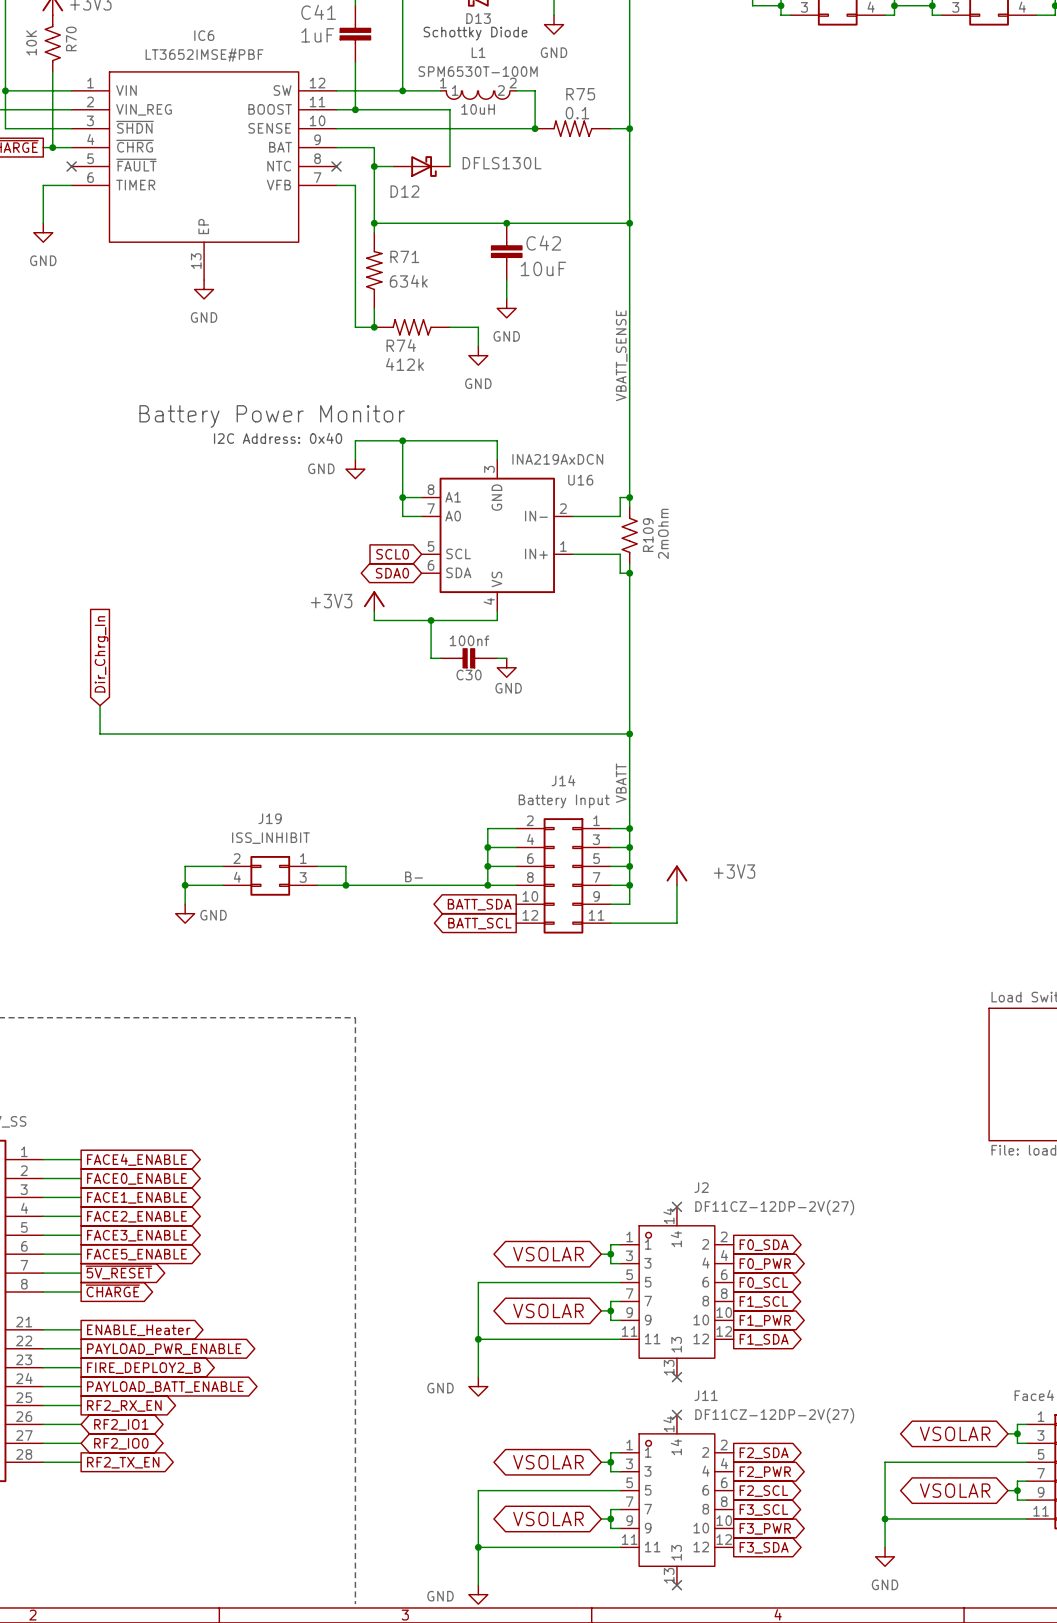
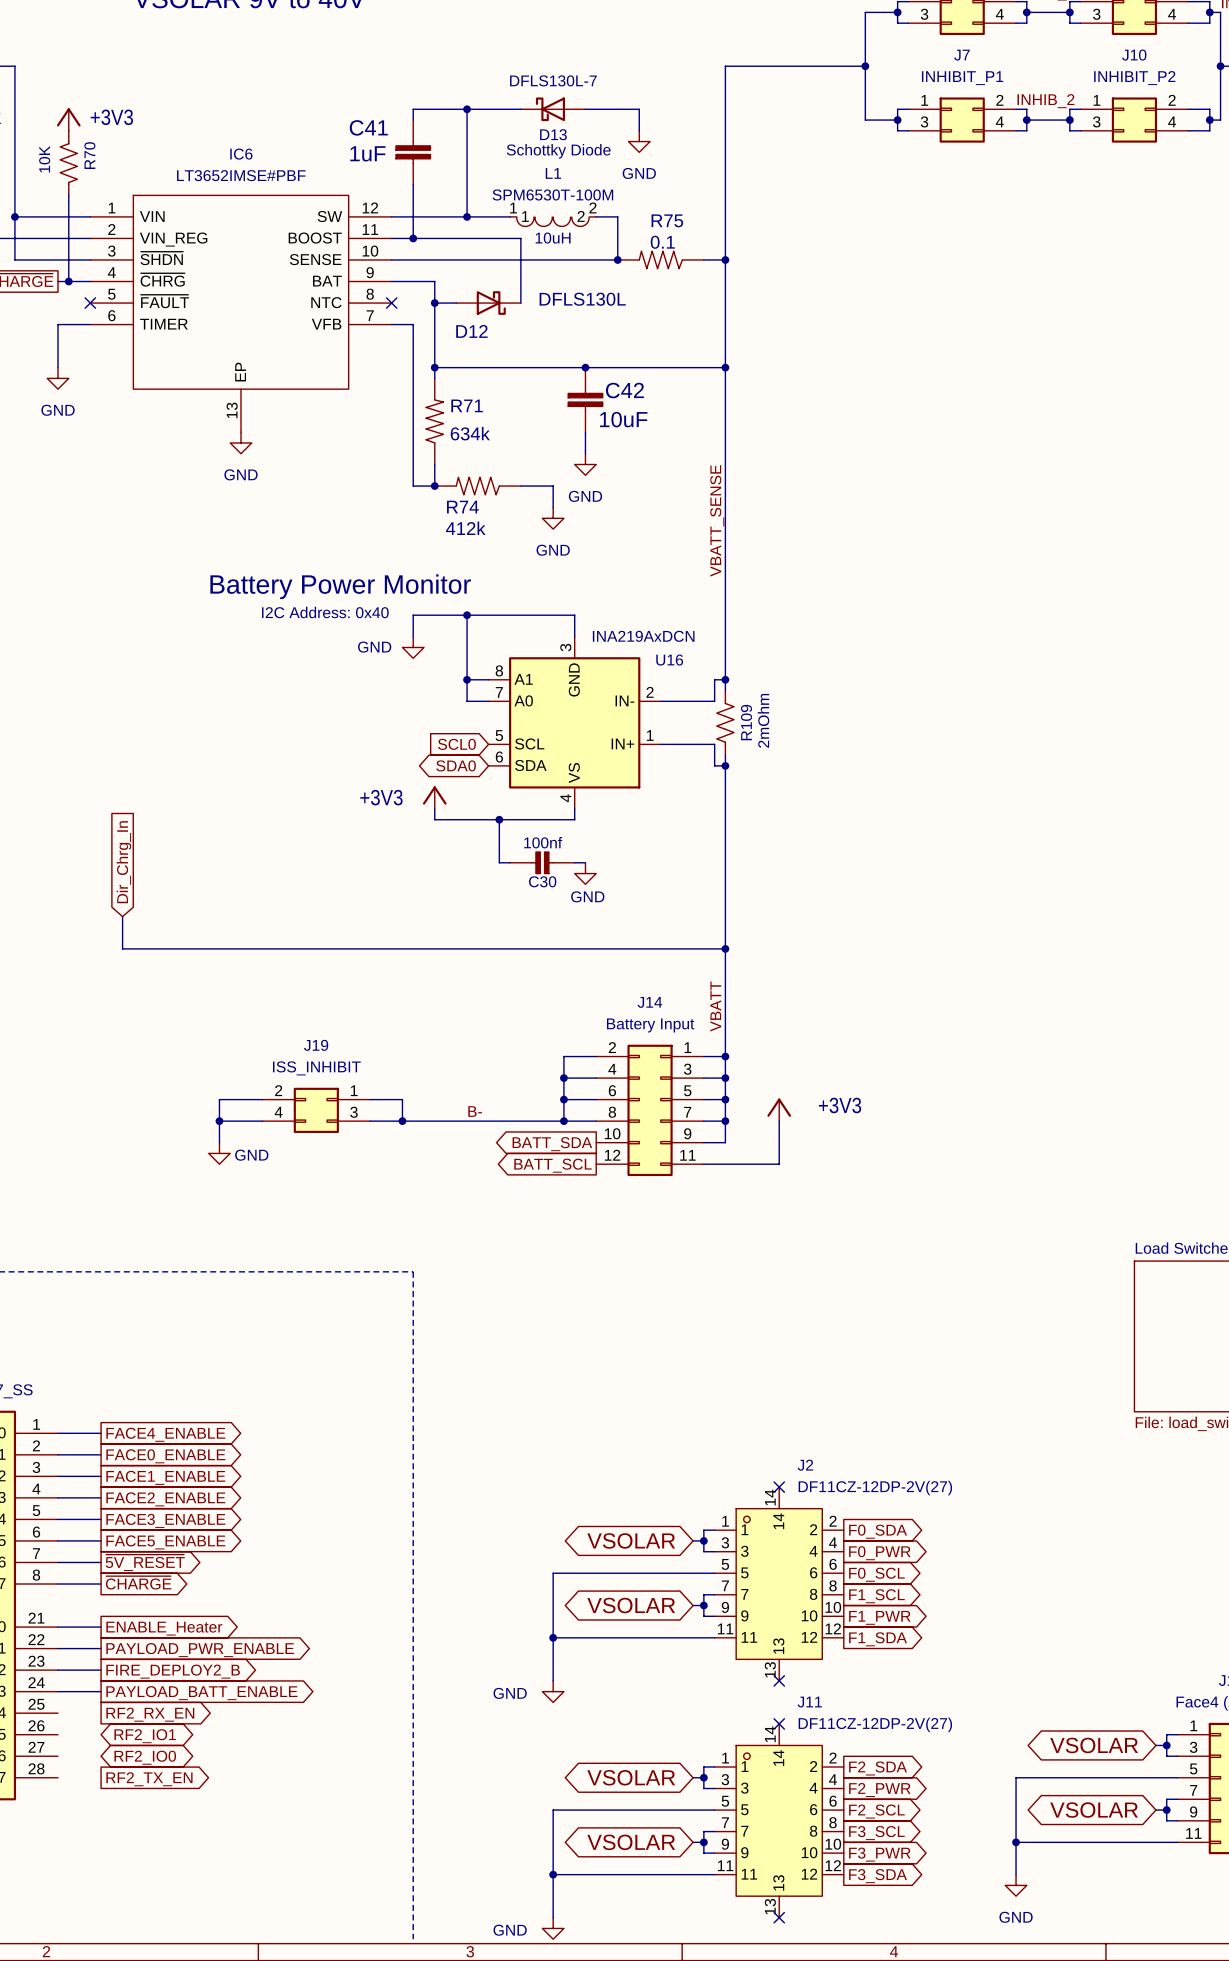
wire: (43, 1405) (81, 1405) -> none
wire: (43, 1424) (81, 1424) -> none
wire: (43, 1443) (81, 1443) -> none
wire: (43, 1462) (81, 1462) -> none

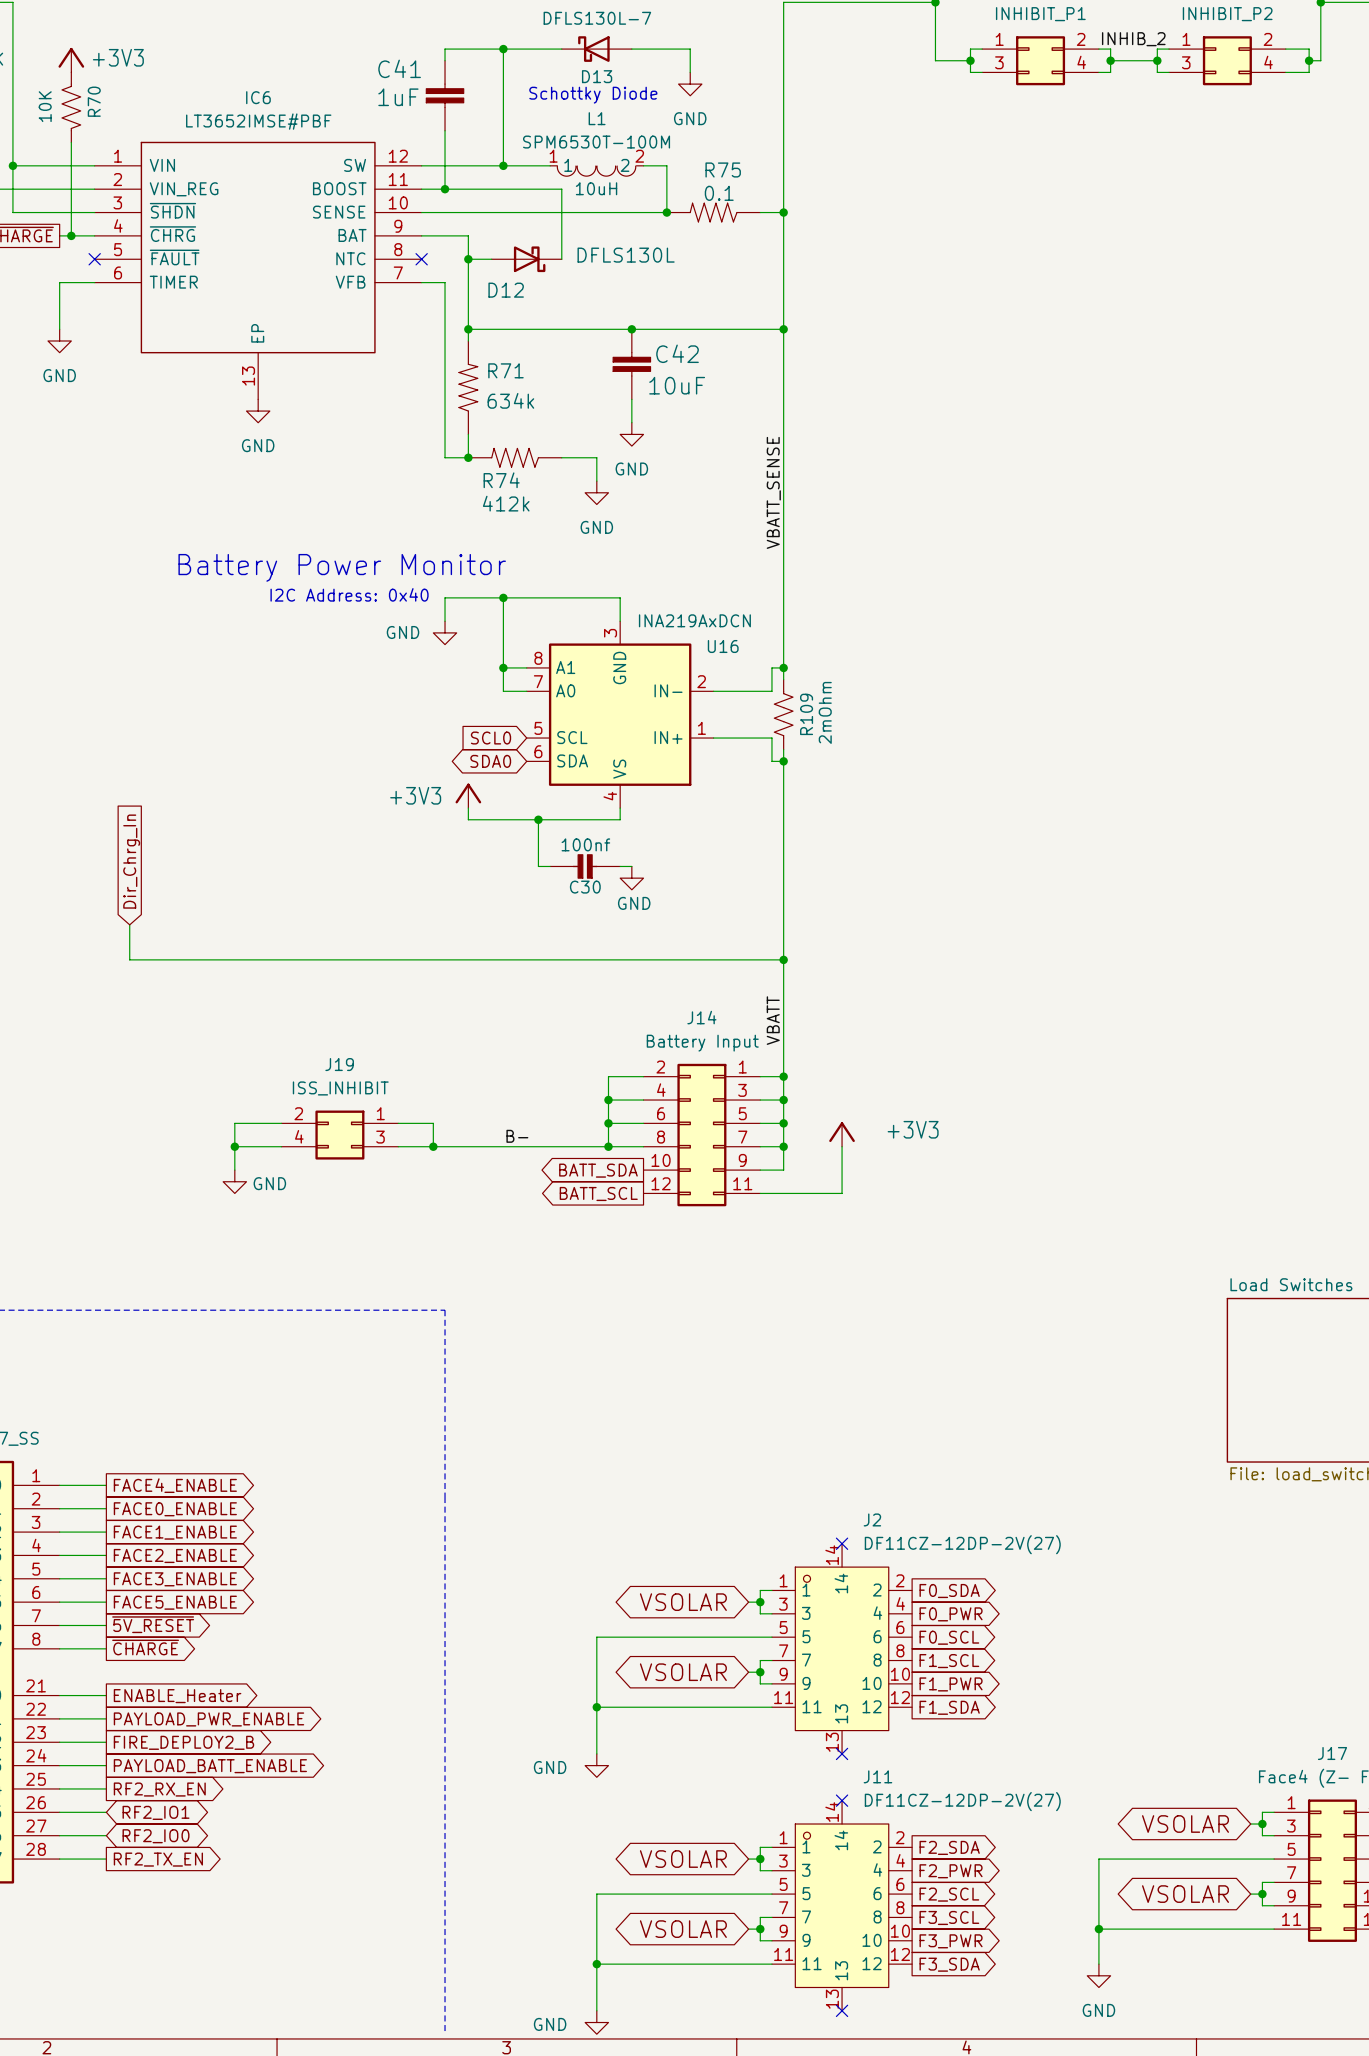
wire: none -> (59, 1788) (106, 1788)
wire: none -> (59, 1812) (106, 1812)
wire: none -> (59, 1835) (106, 1835)
wire: none -> (59, 1859) (106, 1859)

